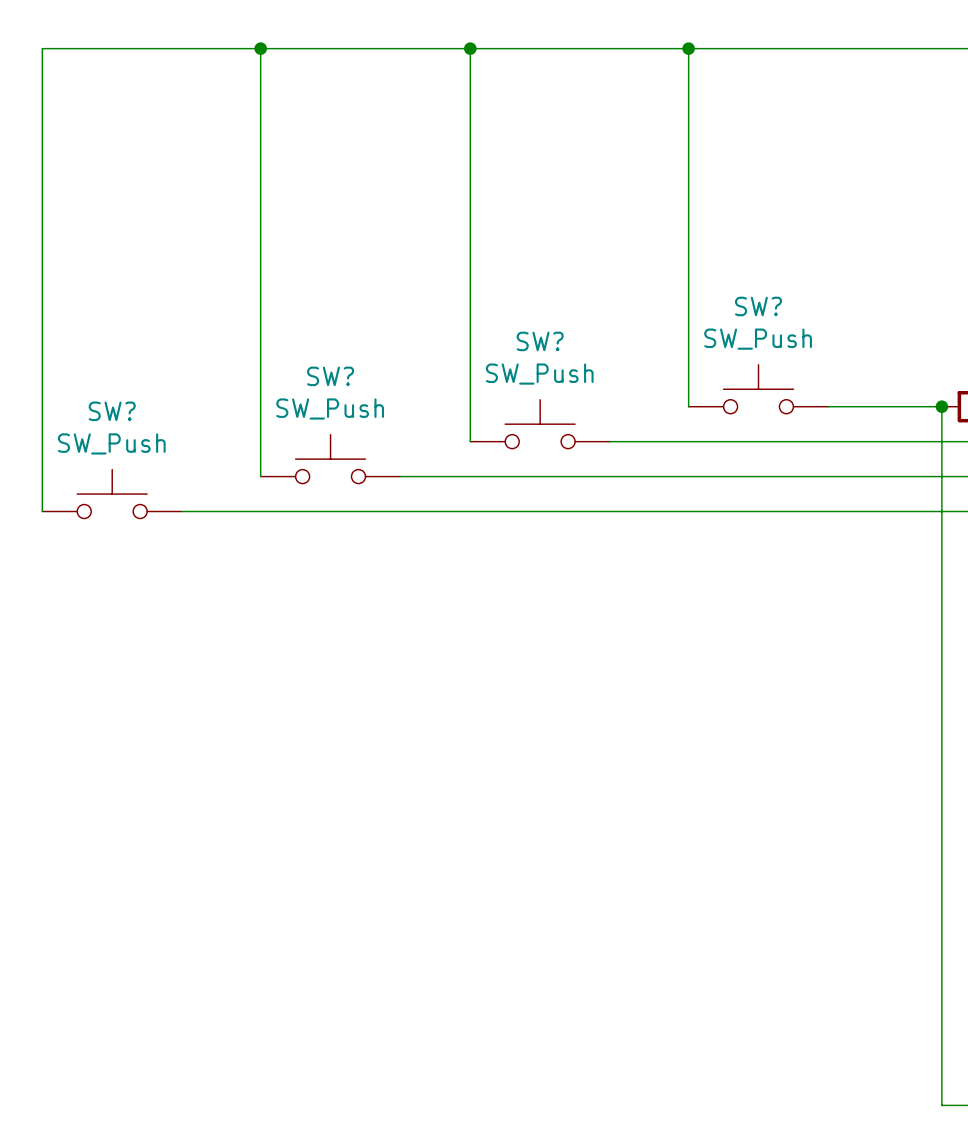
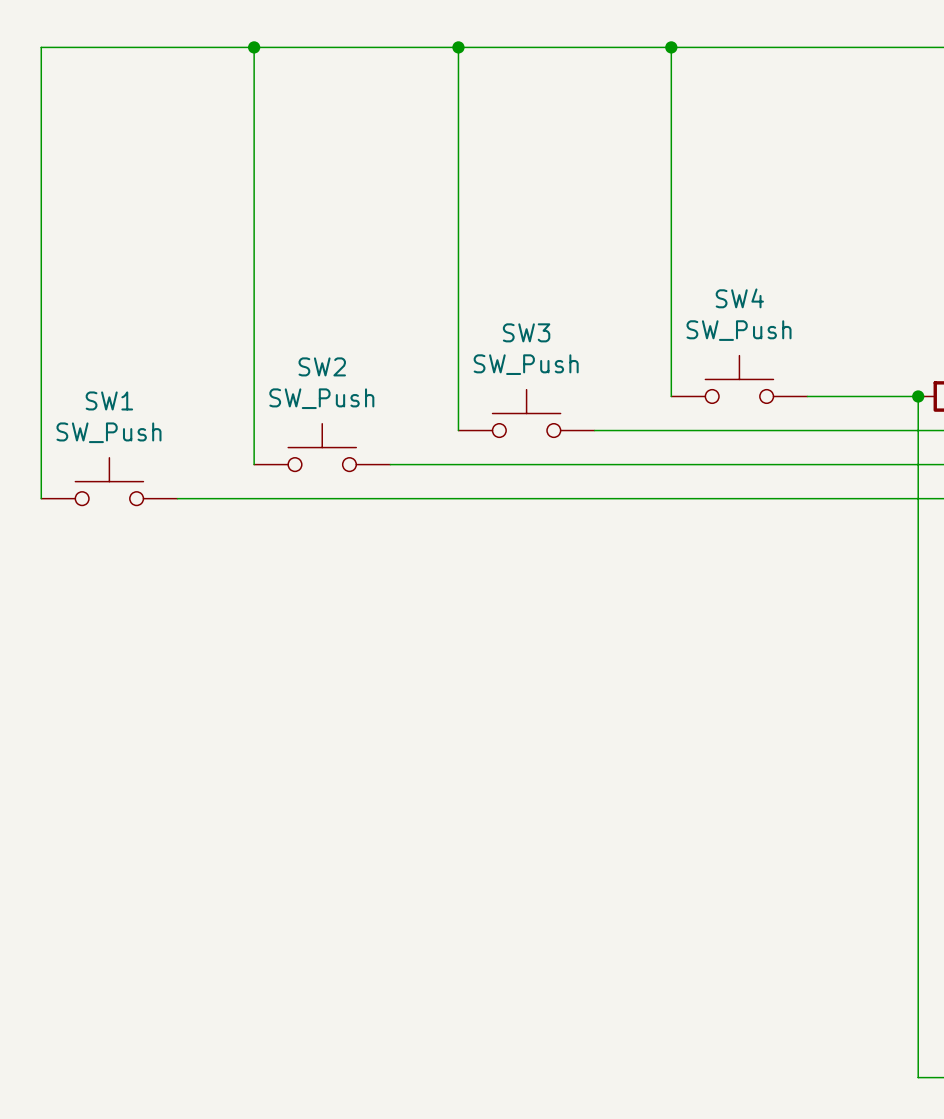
SW? name: SW? (758, 306) -> SW4 (739, 298)
SW? name: SW? (540, 341) -> SW3 (526, 332)
SW? name: SW? (330, 376) -> SW2 (322, 366)
SW? name: SW? (112, 411) -> SW1 (109, 400)

